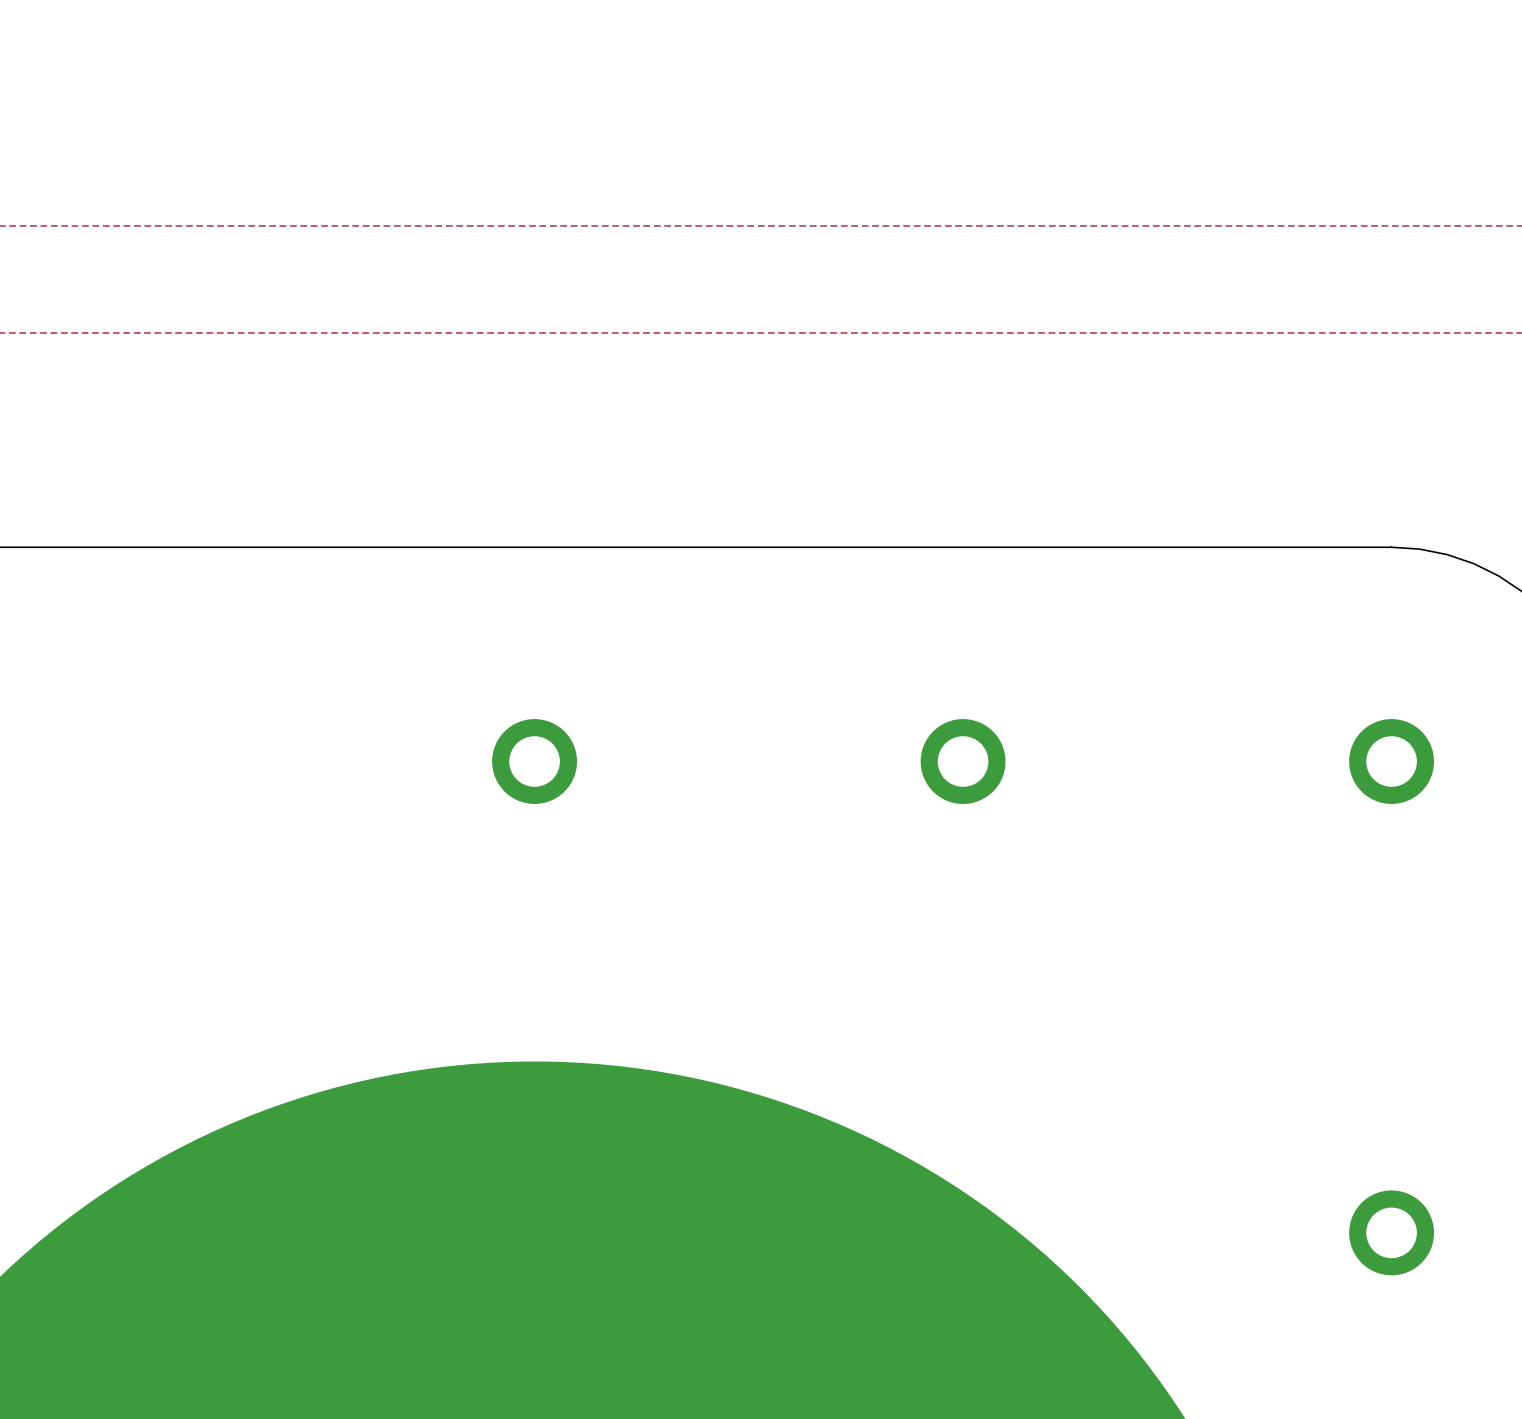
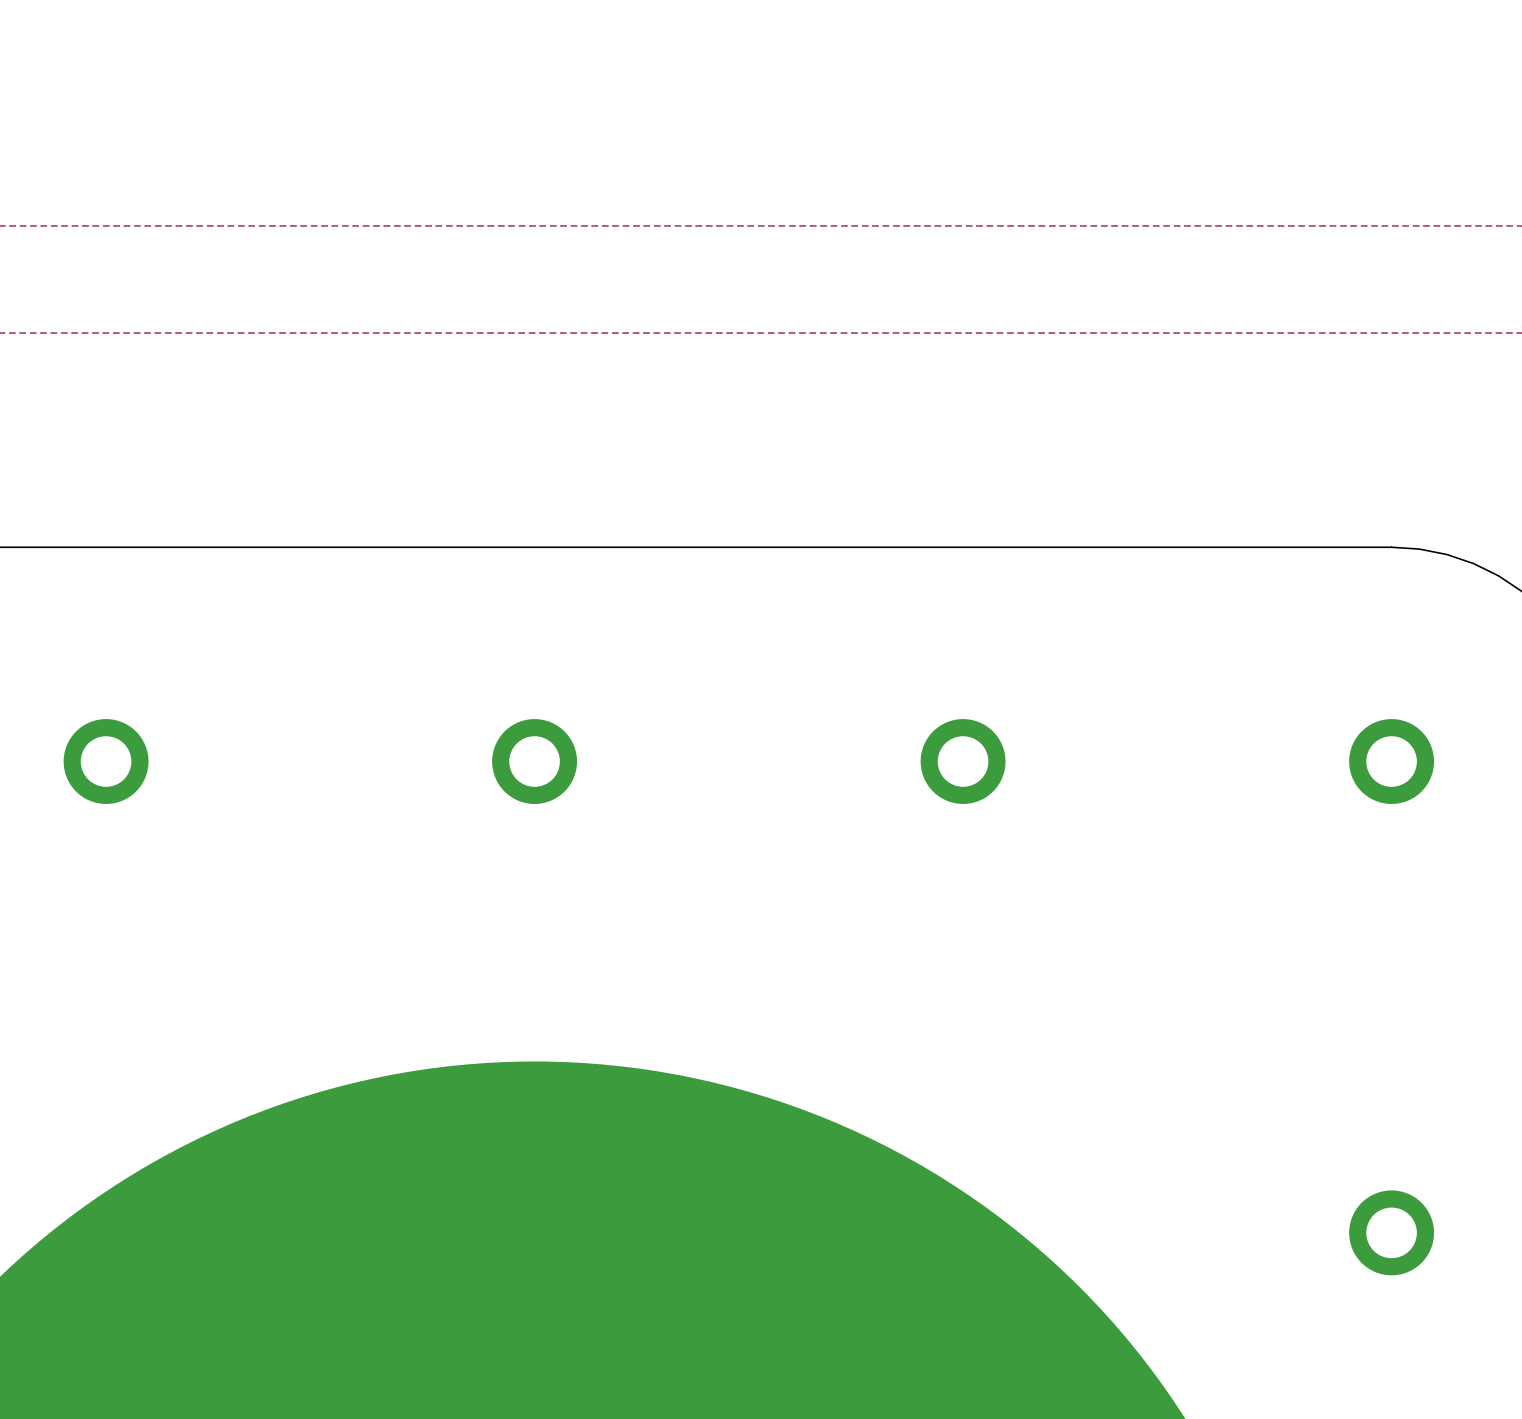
via: none -> (106, 761)

